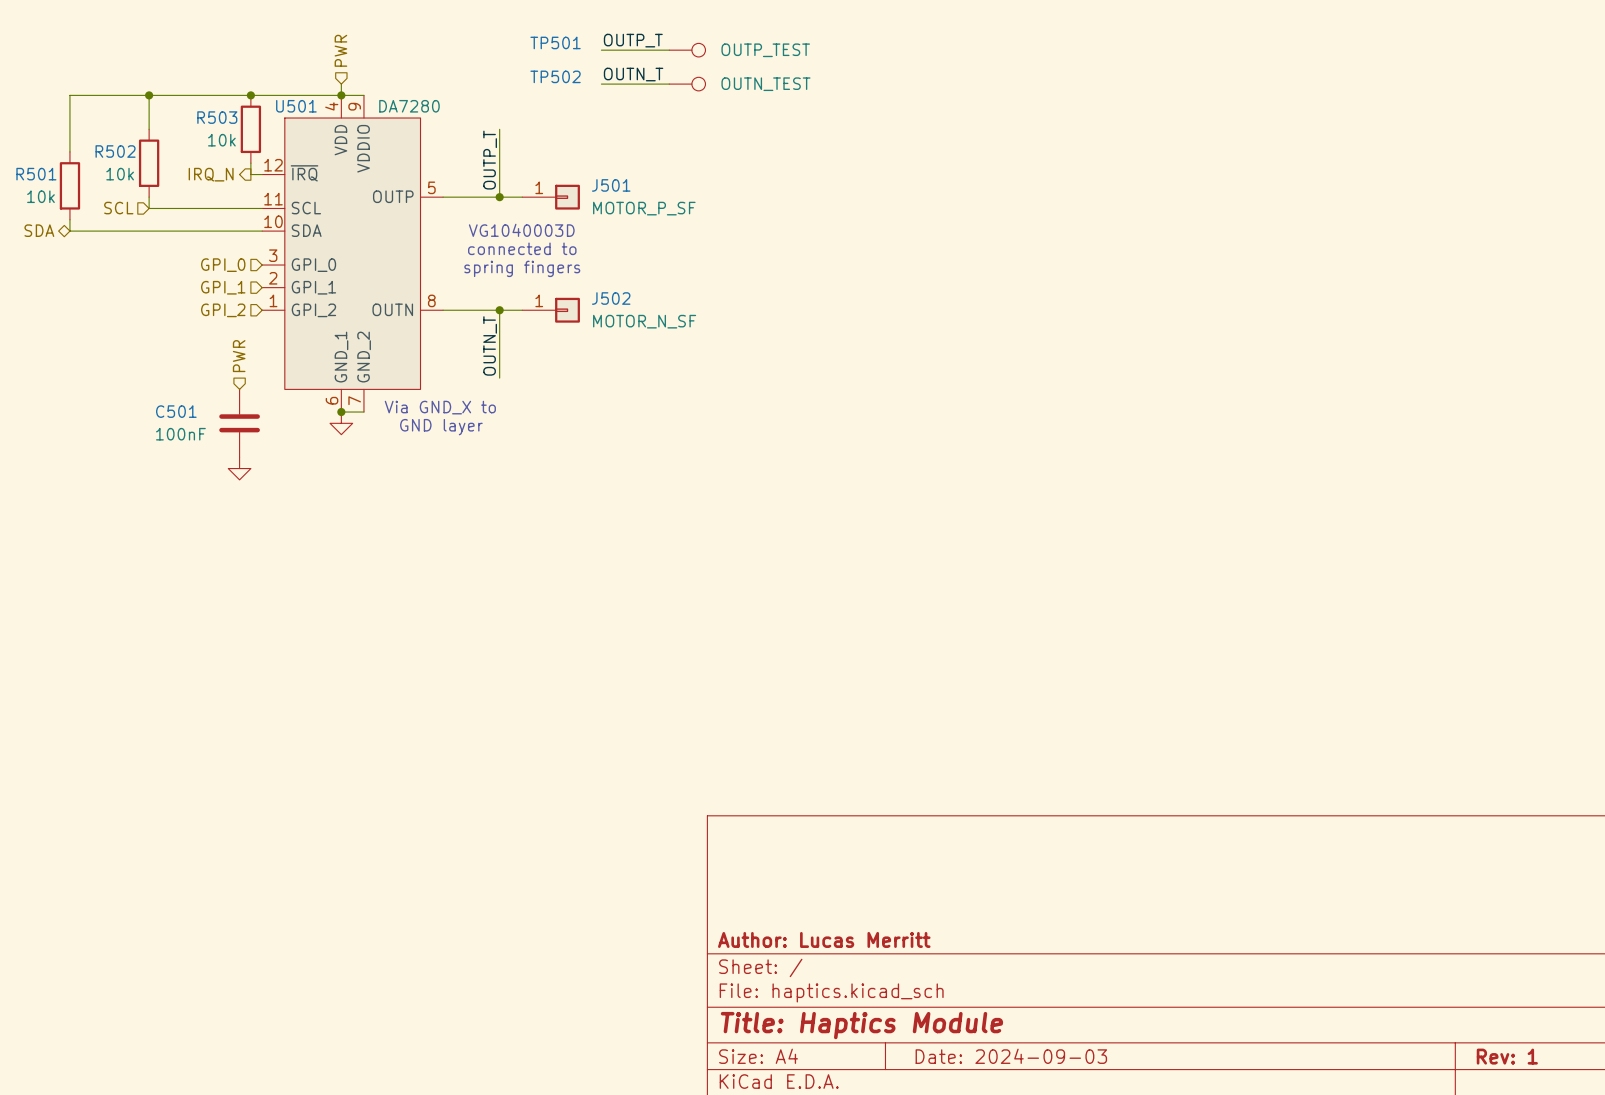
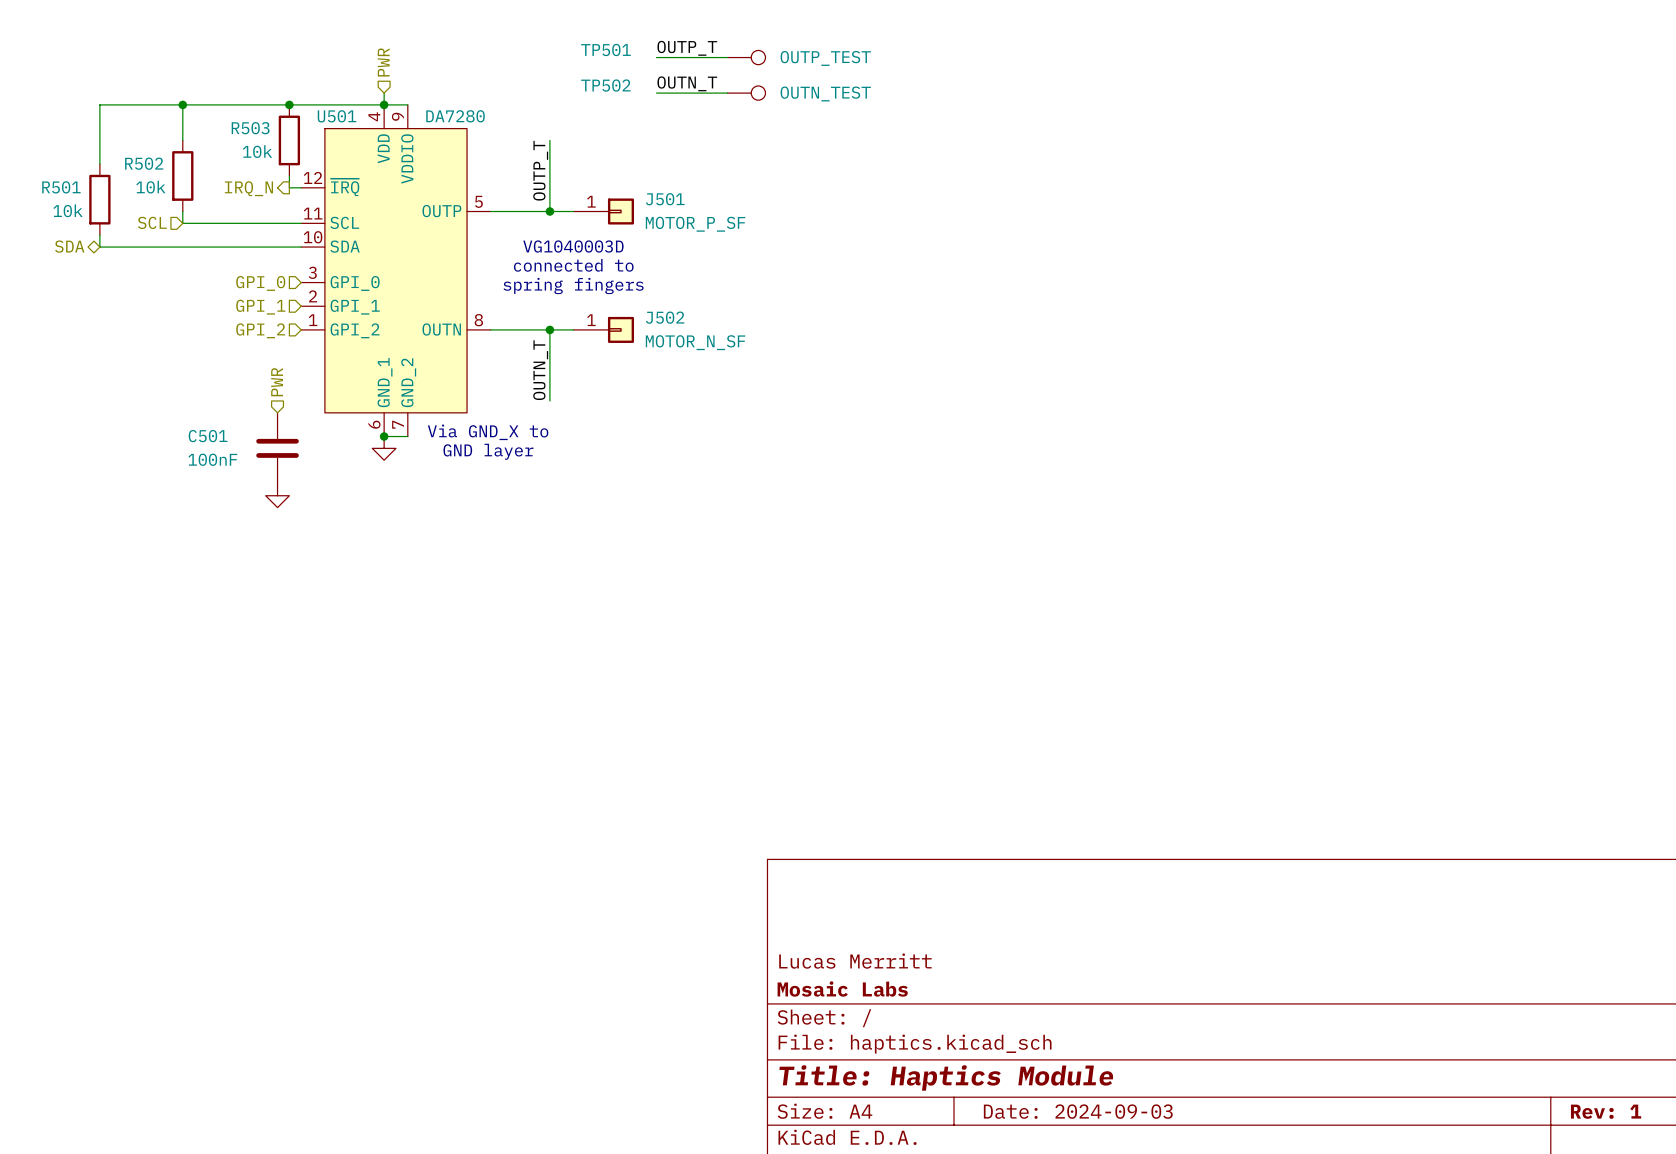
title block: none -> Lucas Merritt (855, 961)
title block: Author: Lucas Merritt (824, 939) -> Mosaic Labs (842, 989)

